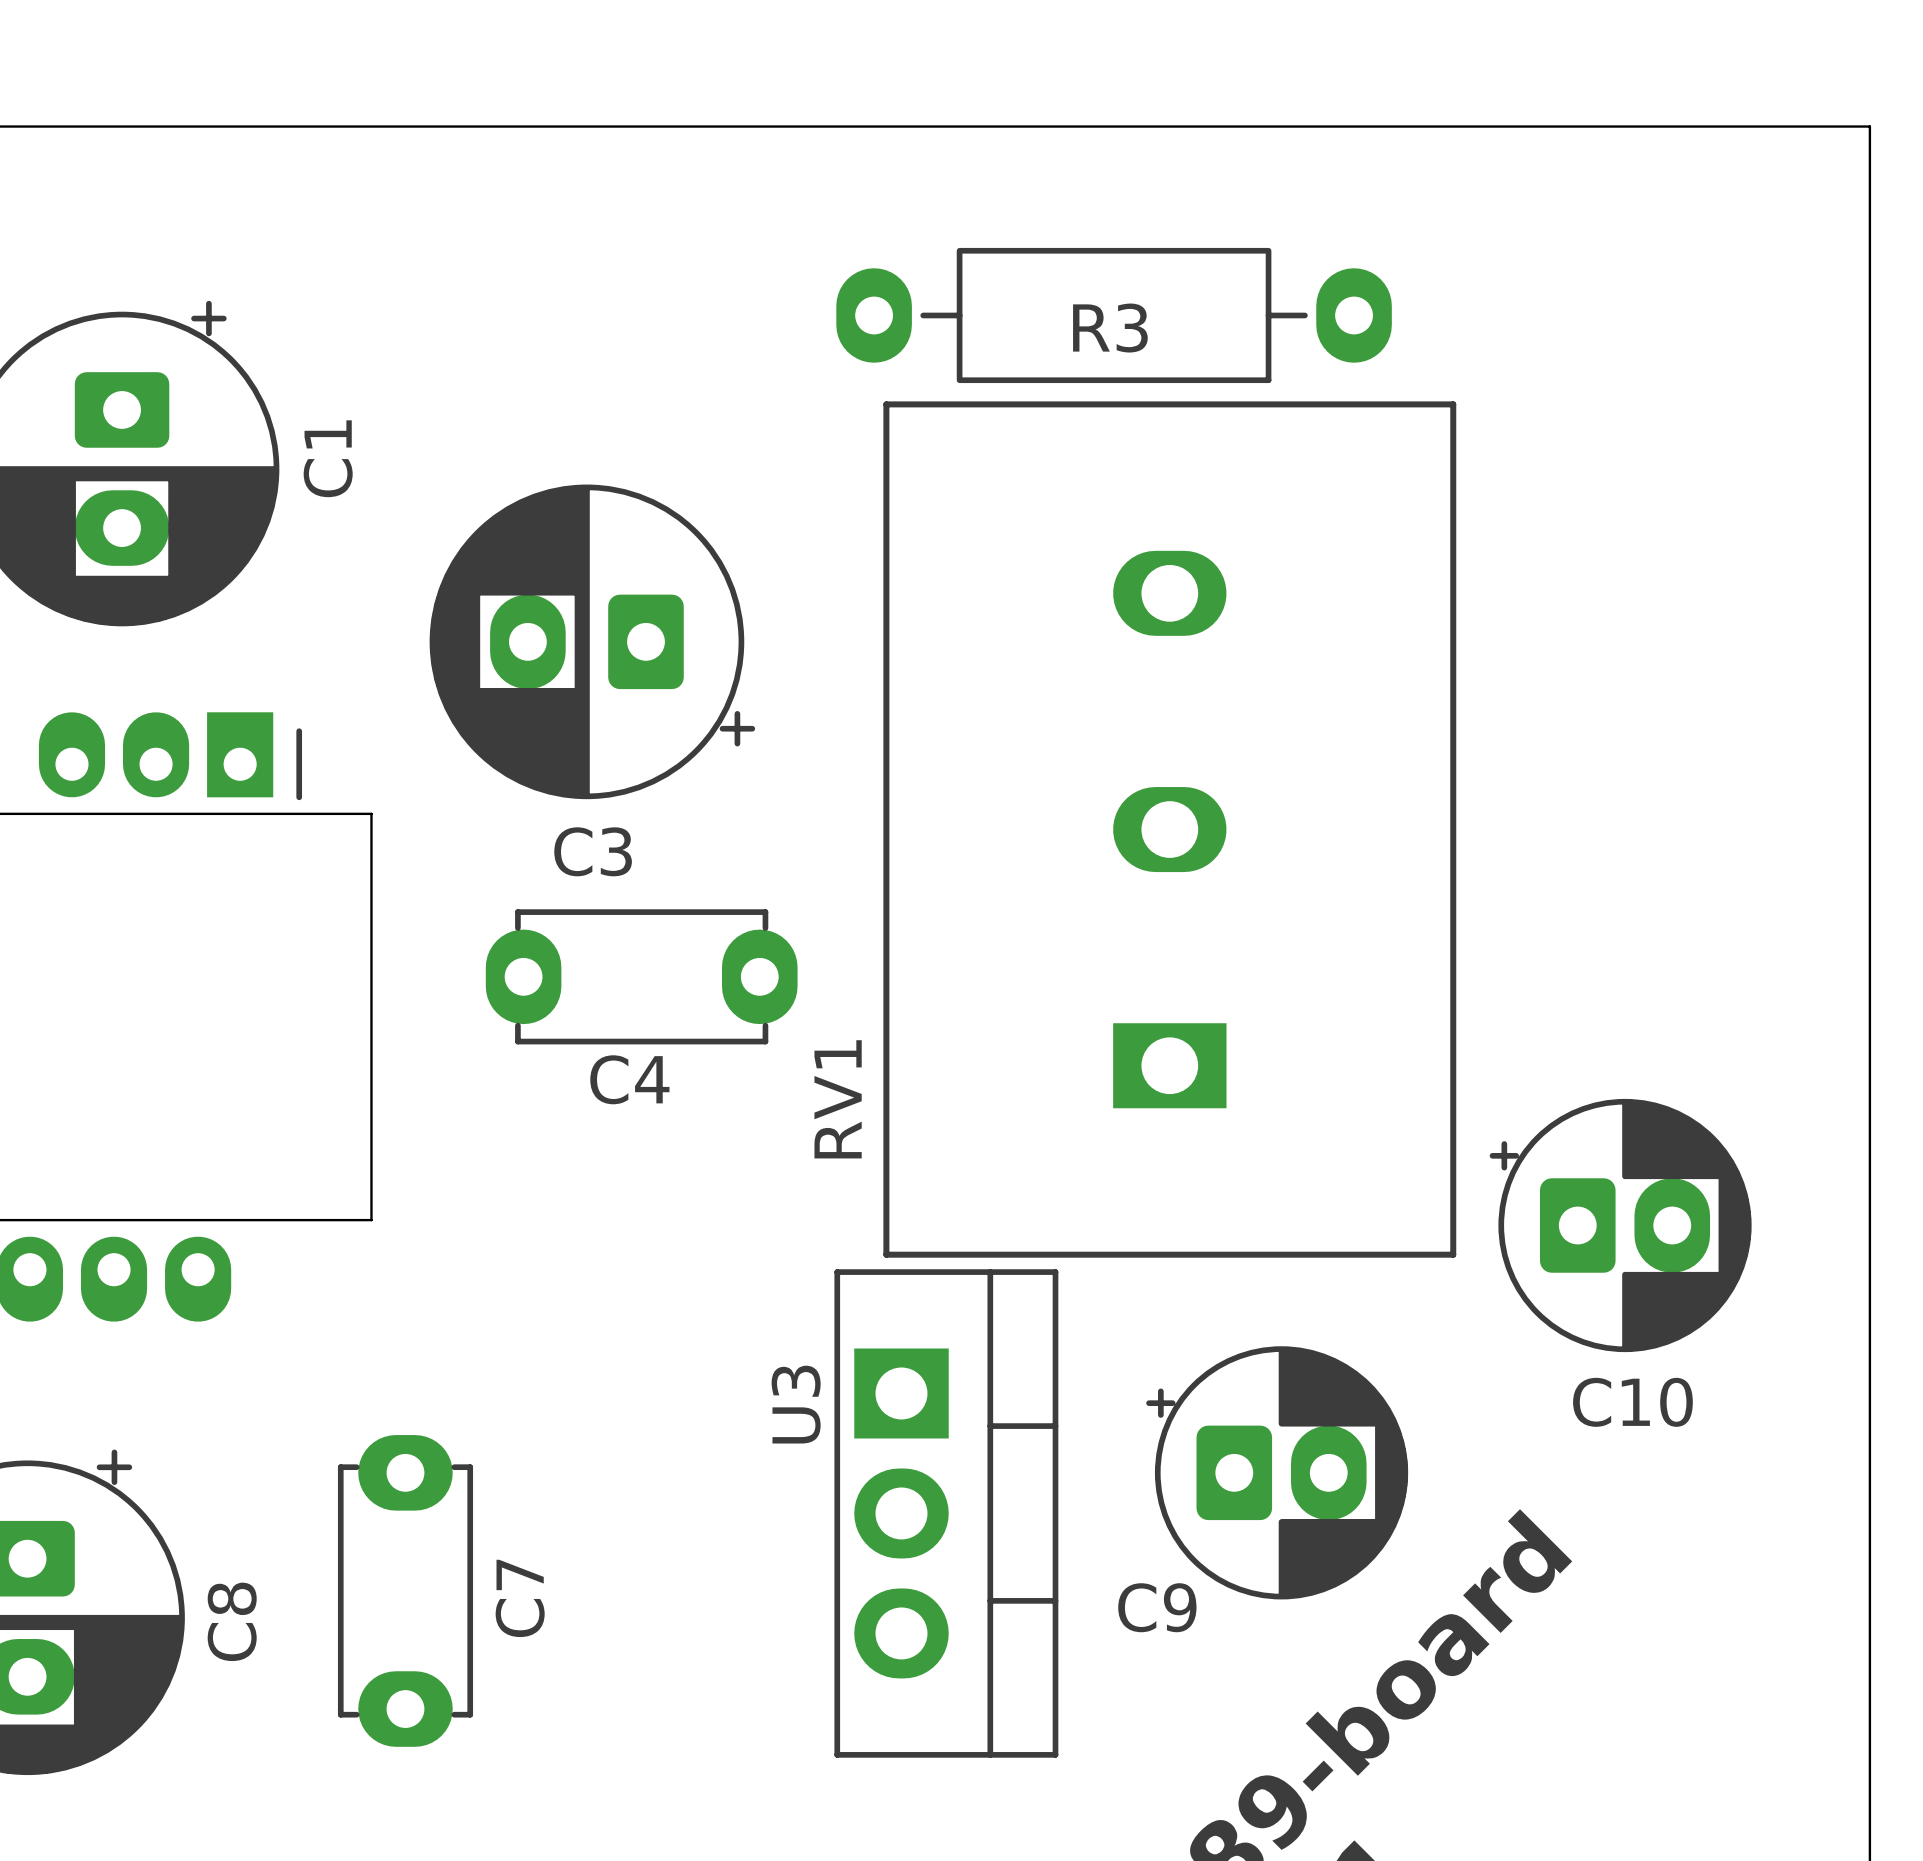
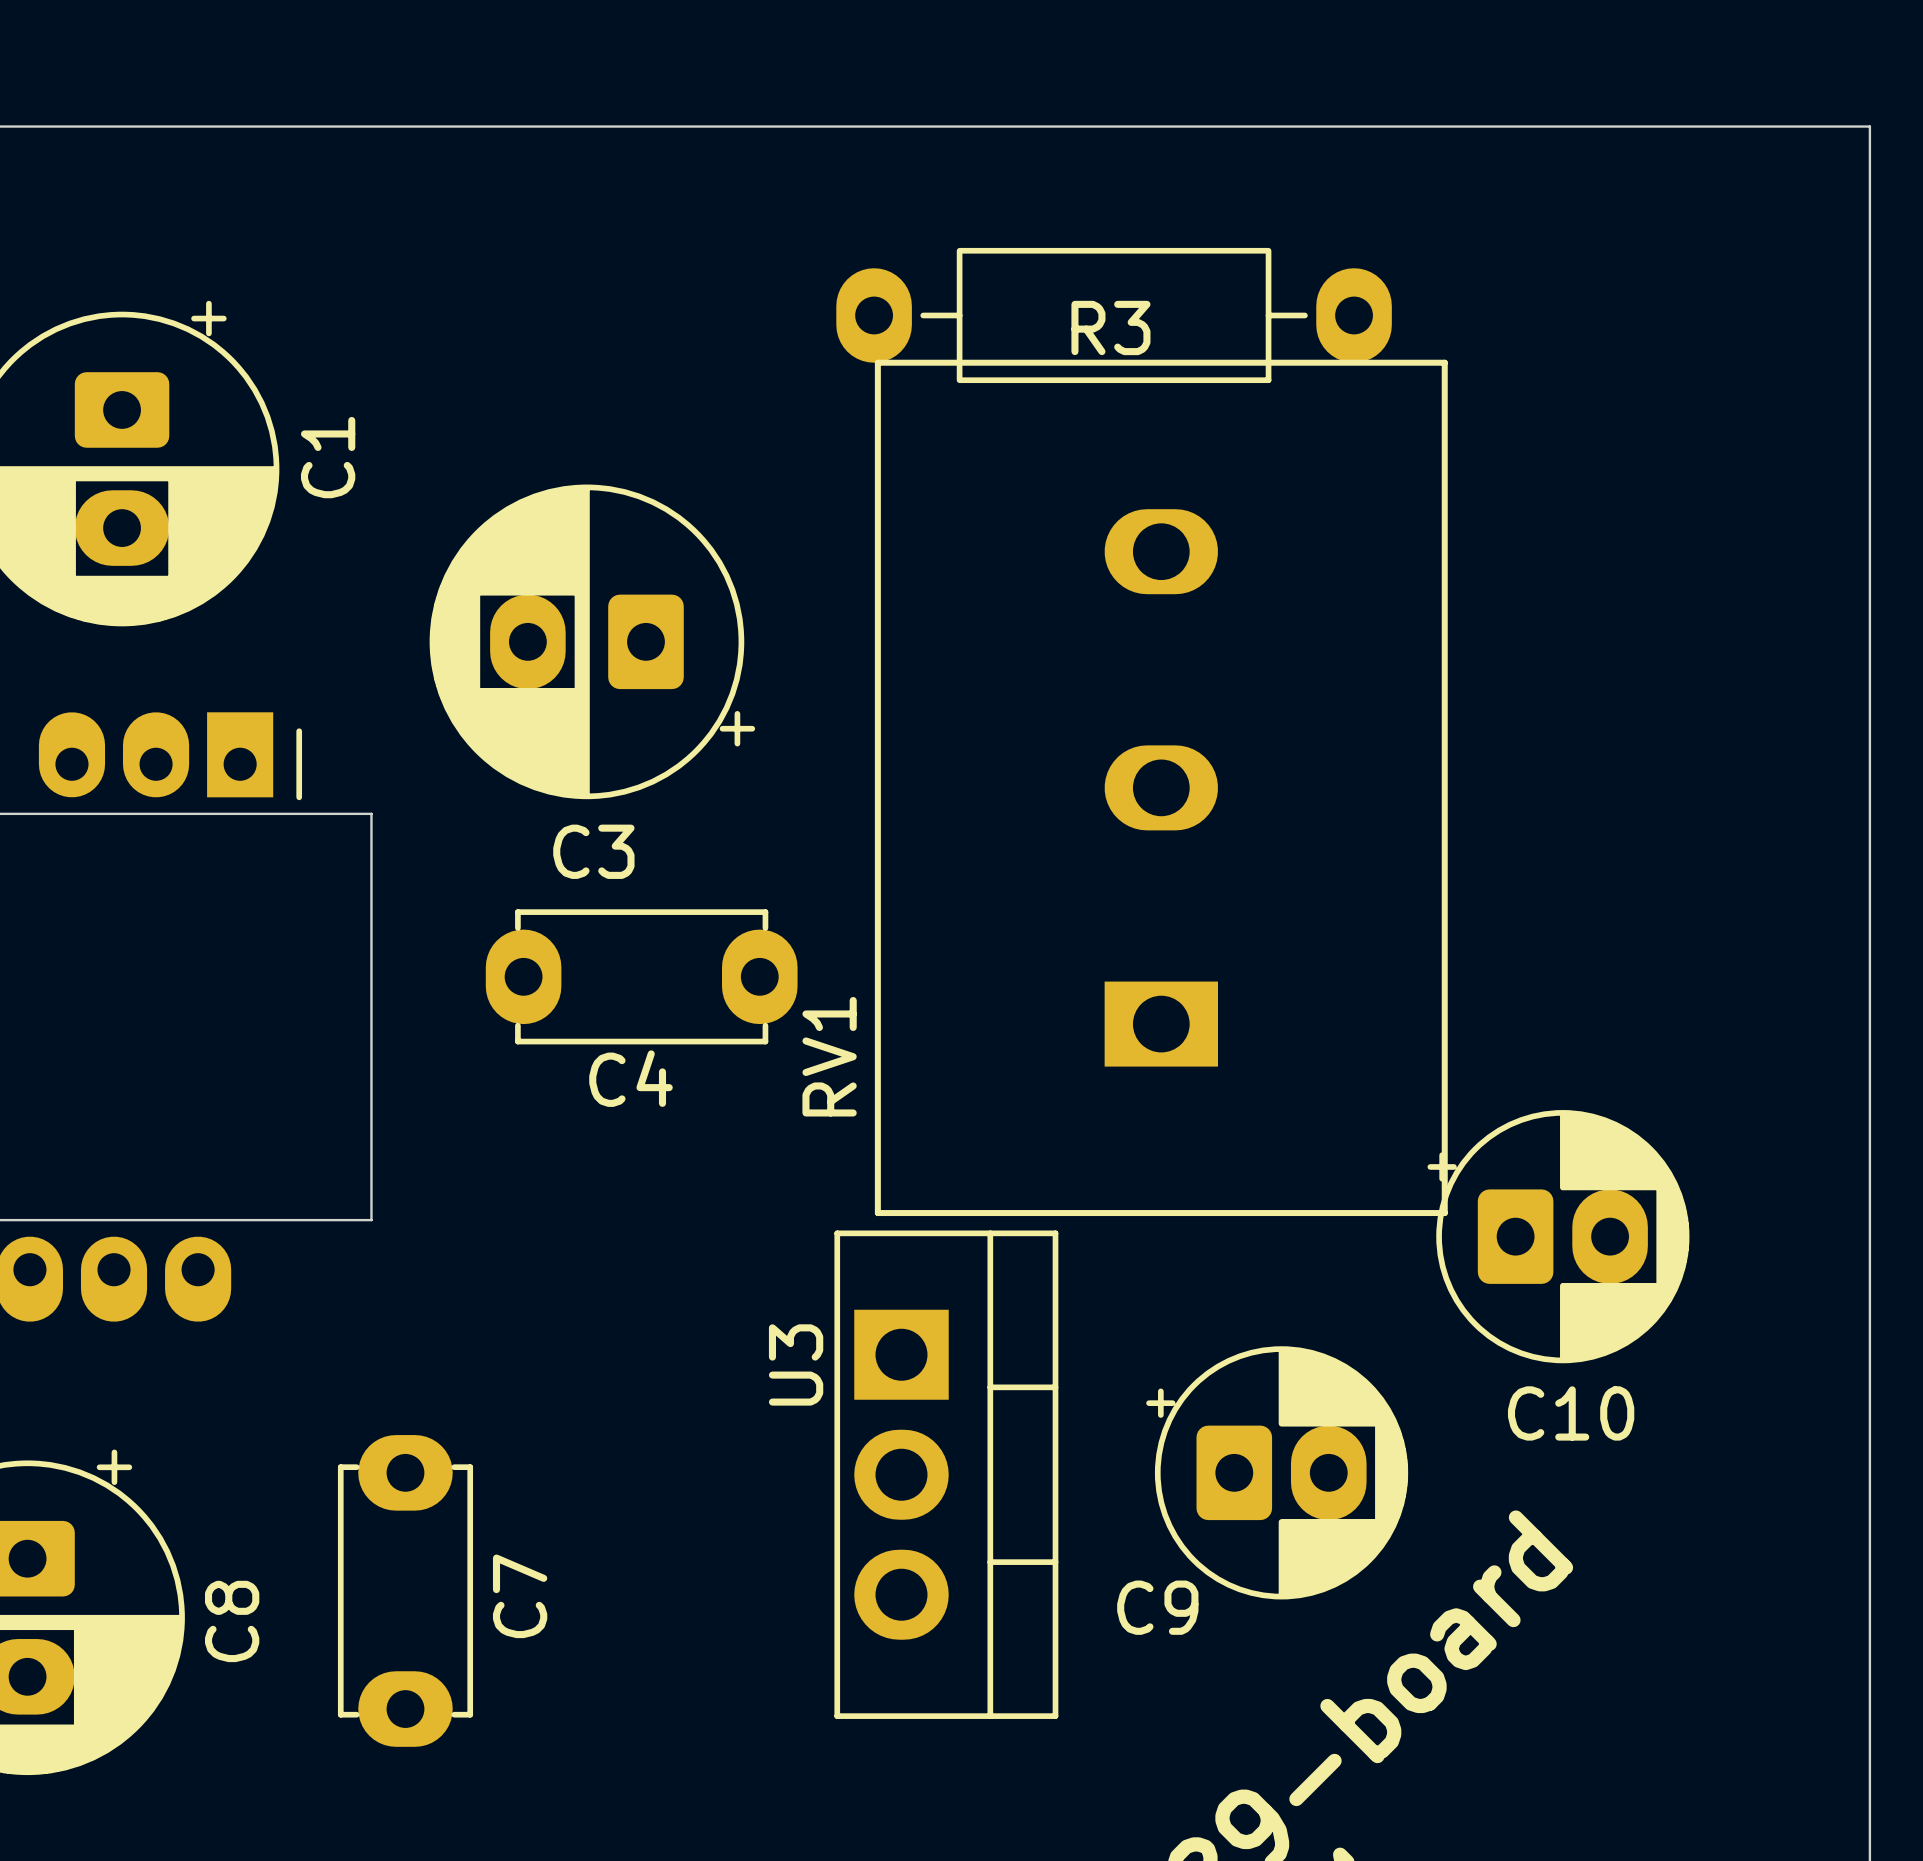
RV1 position: (1169, 829) -> (1161, 787)
C10 position: (1620, 1225) -> (1558, 1236)
U3 position: (946, 1513) -> (946, 1474)

